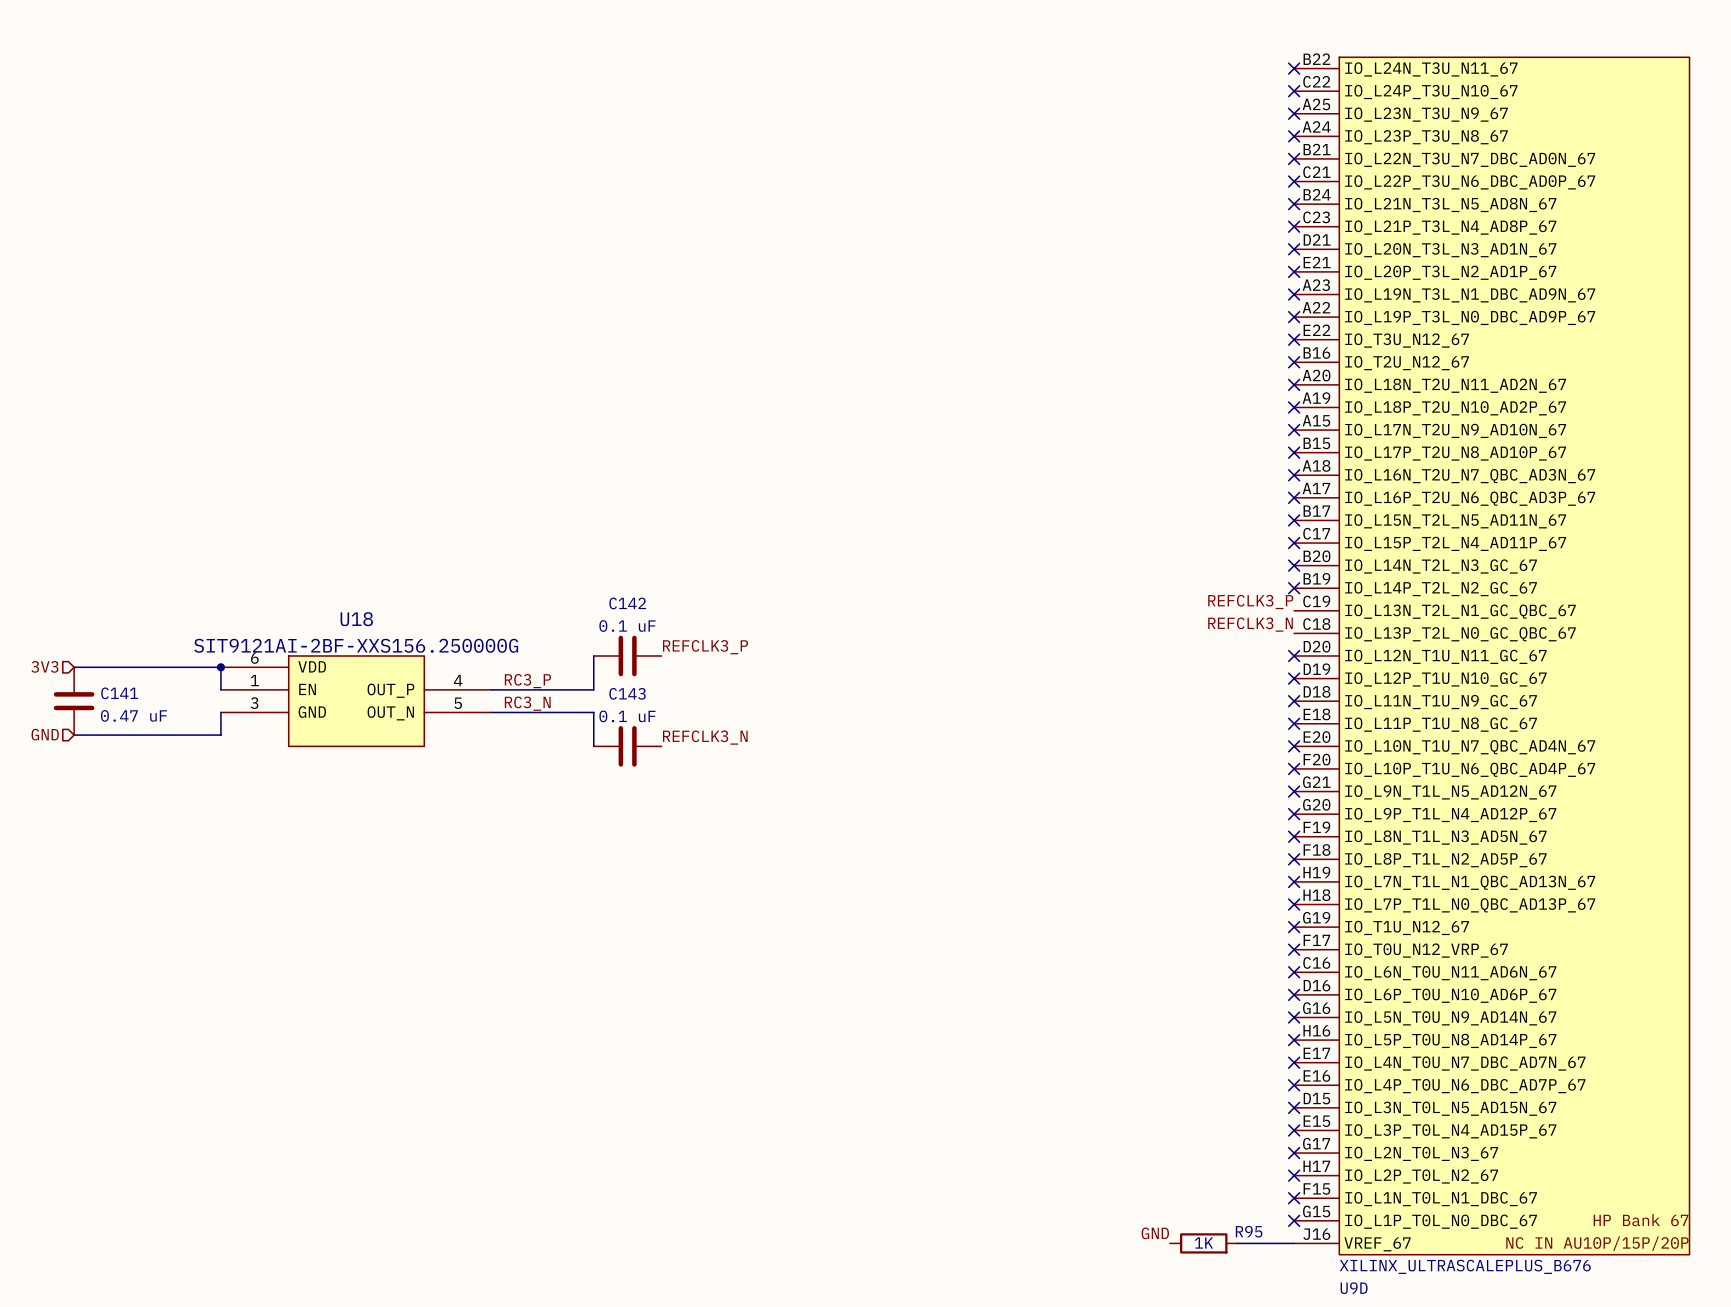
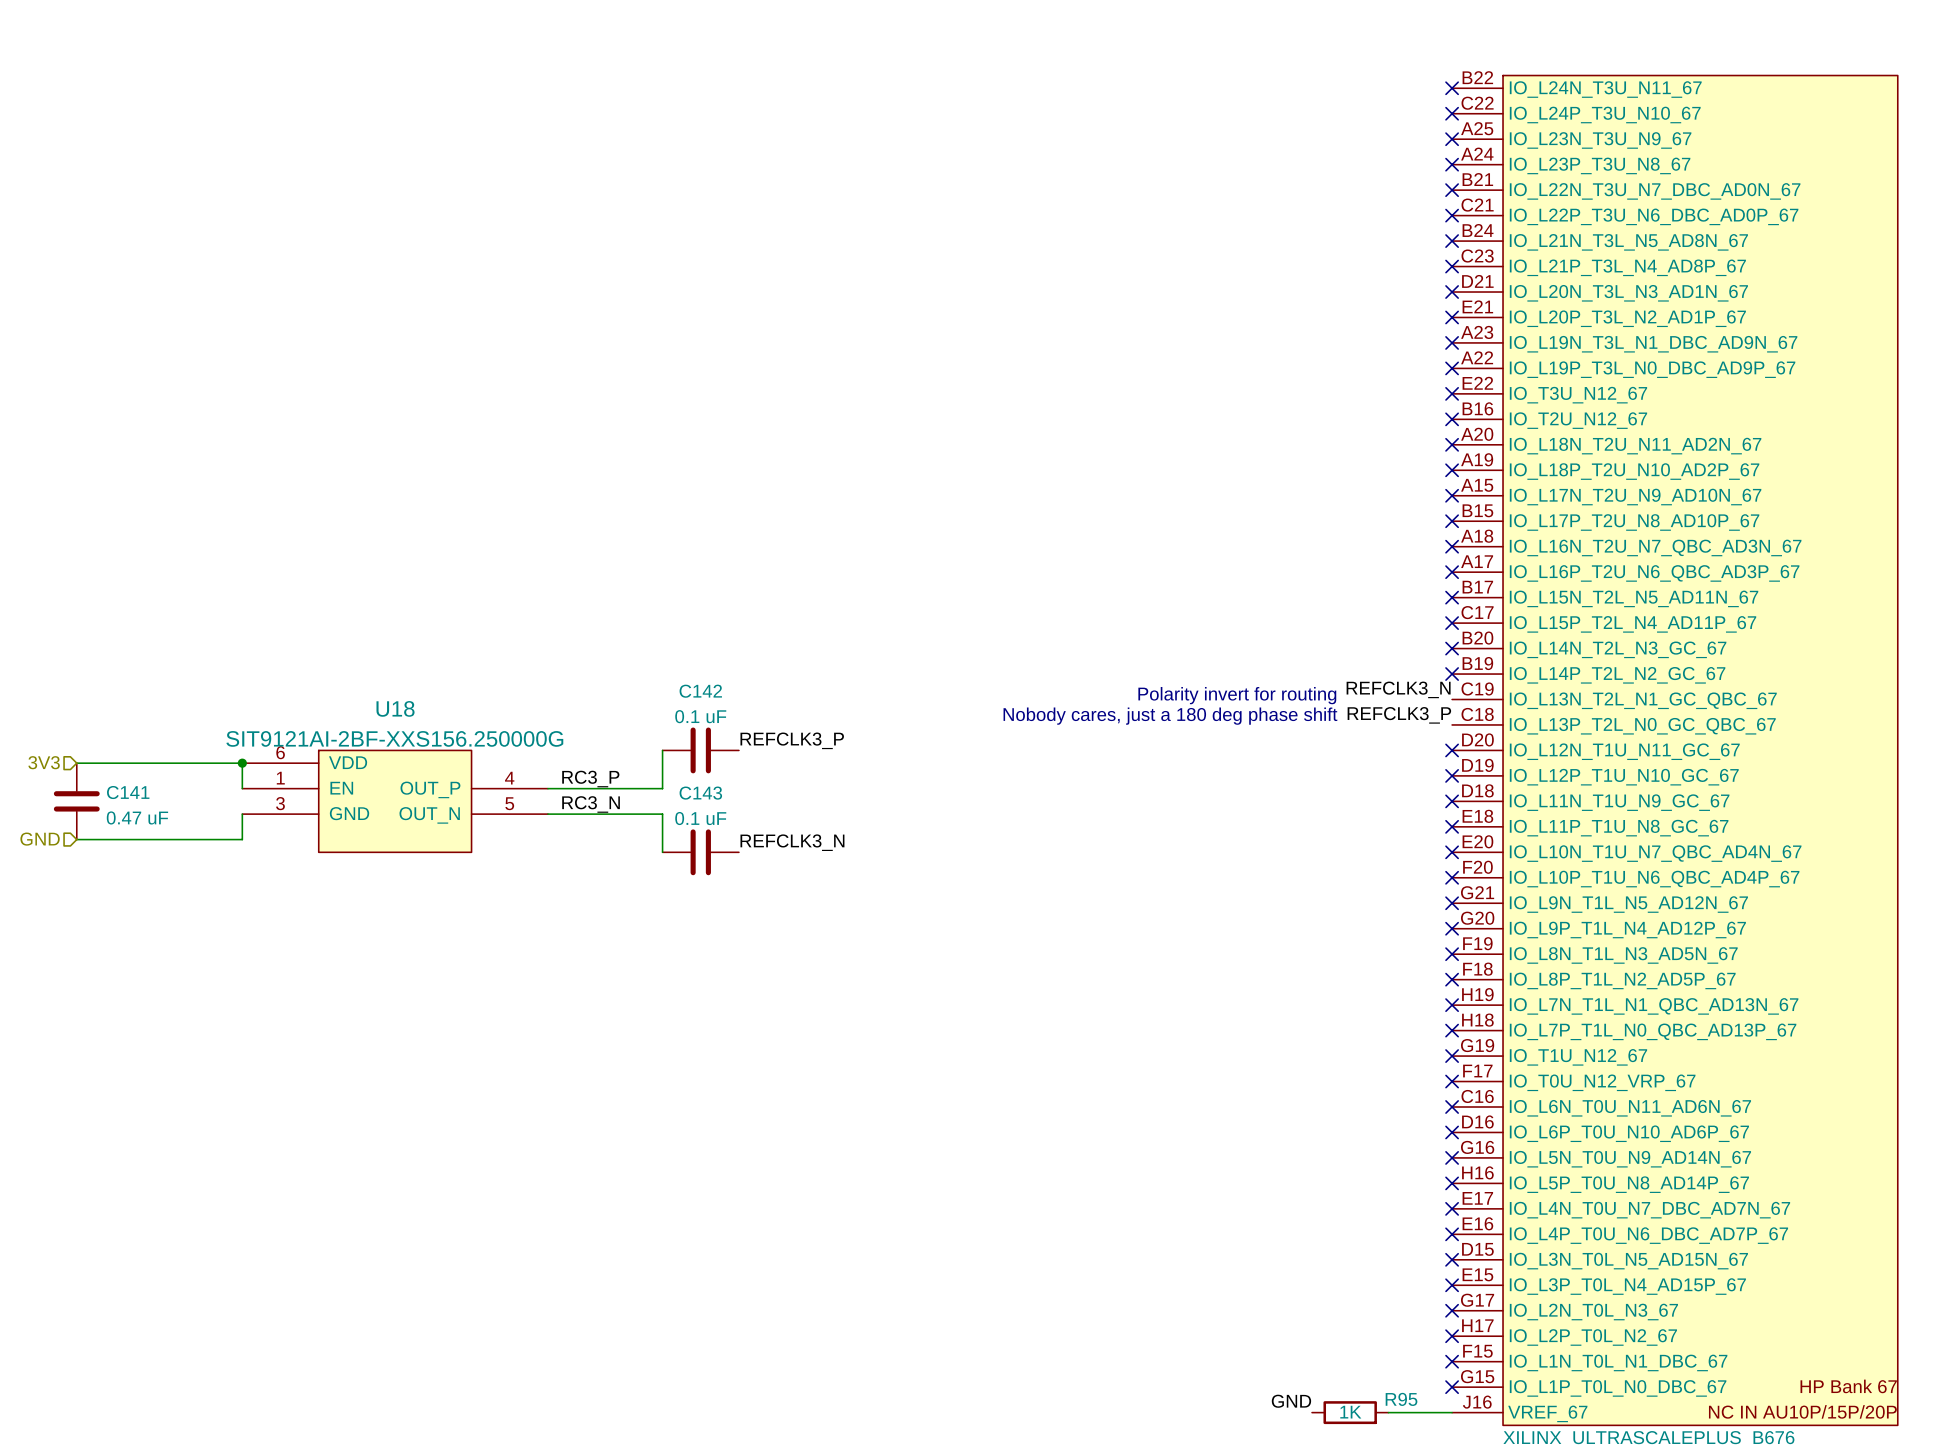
label: REFCLK3_P (1250, 602) -> REFCLK3_N (1398, 689)
text: none -> Polarity invert for routing (1237, 695)
label: REFCLK3_N (1250, 624) -> REFCLK3_P (1399, 715)
text: none -> Nobody cares, just a 180 deg phase shift (1170, 716)

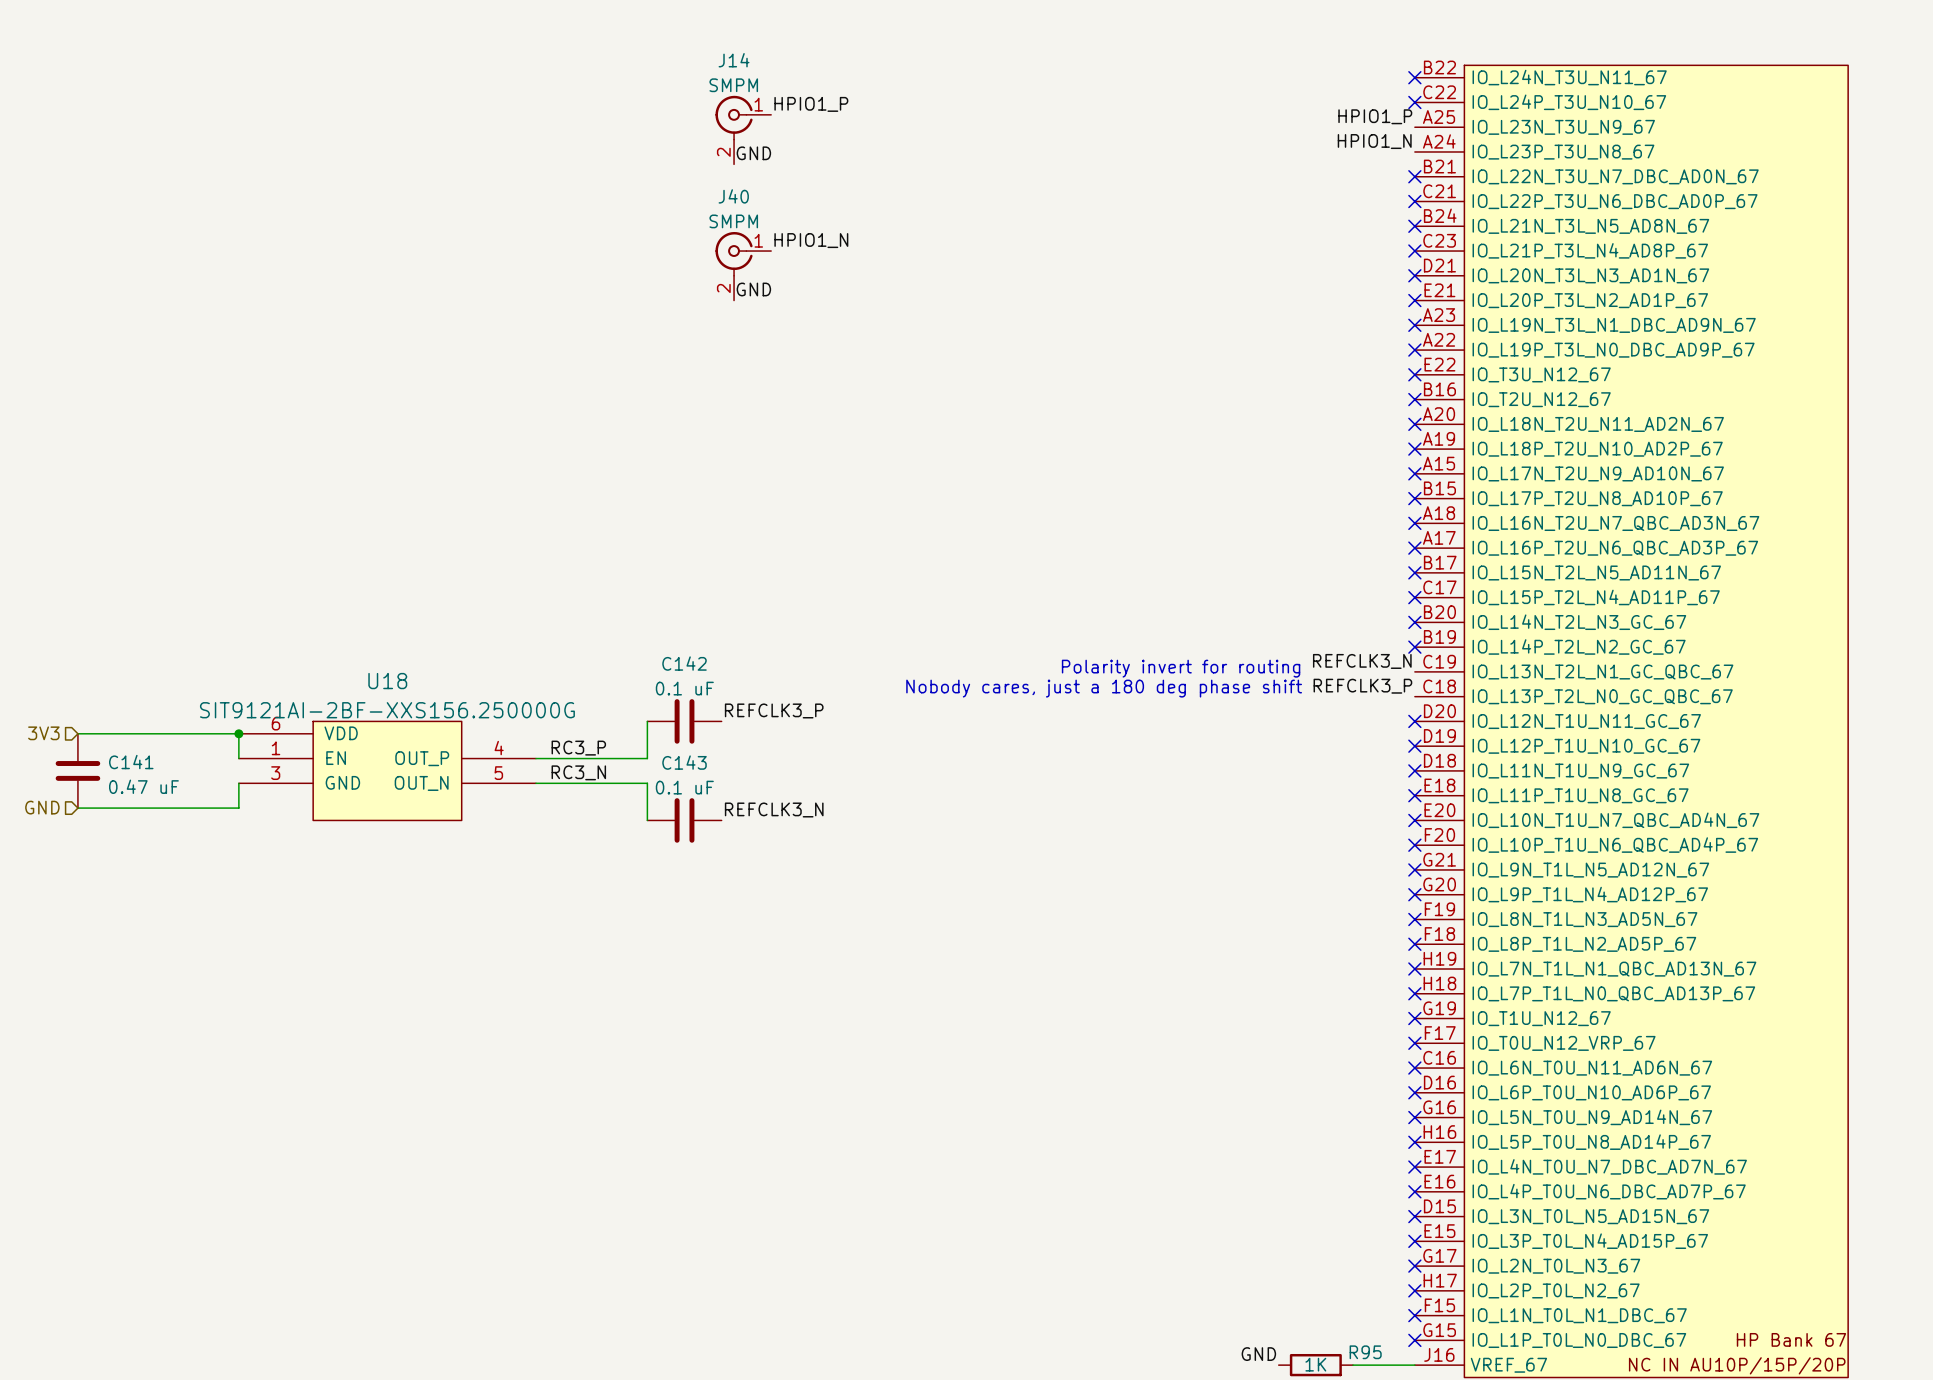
label: none -> HPIO1_P (811, 104)
label: none -> HPIO1_P (1375, 116)
no-connect mark: (1452, 139) -> none
J14: none -> SMPM (743, 130)
label: none -> HPIO1_N (1374, 141)
no-connect mark: (1452, 164) -> none
label: none -> GND (753, 153)
label: none -> HPIO1_N (811, 240)
J40: none -> SMPM (743, 266)
label: none -> GND (753, 289)

